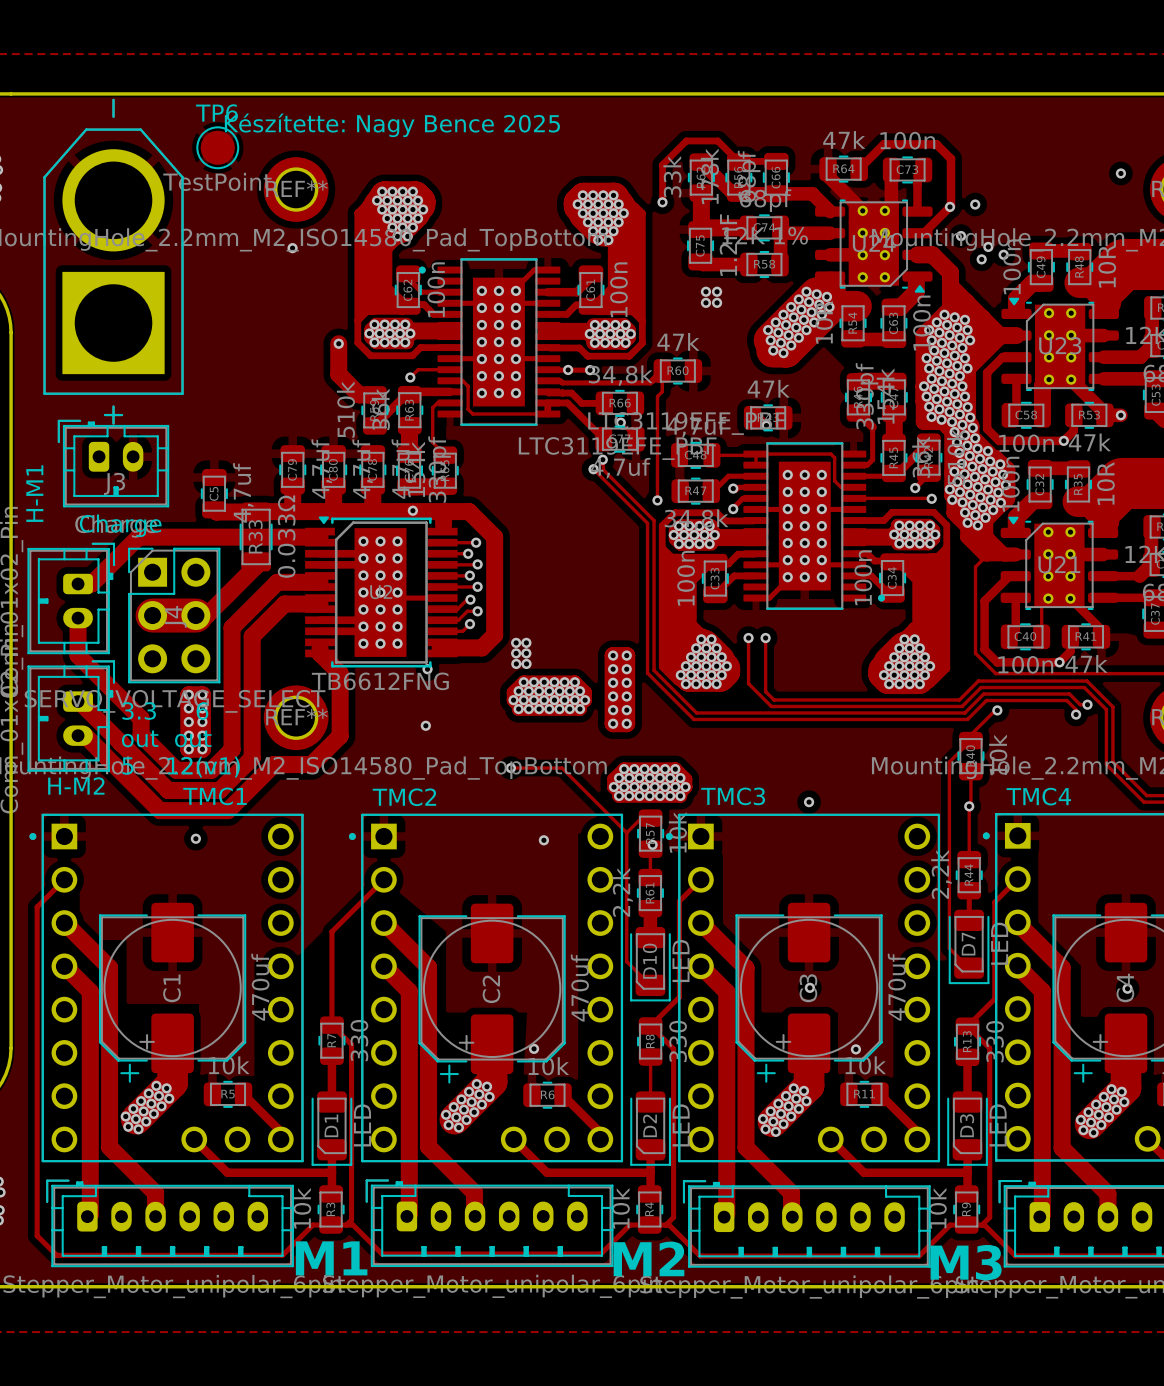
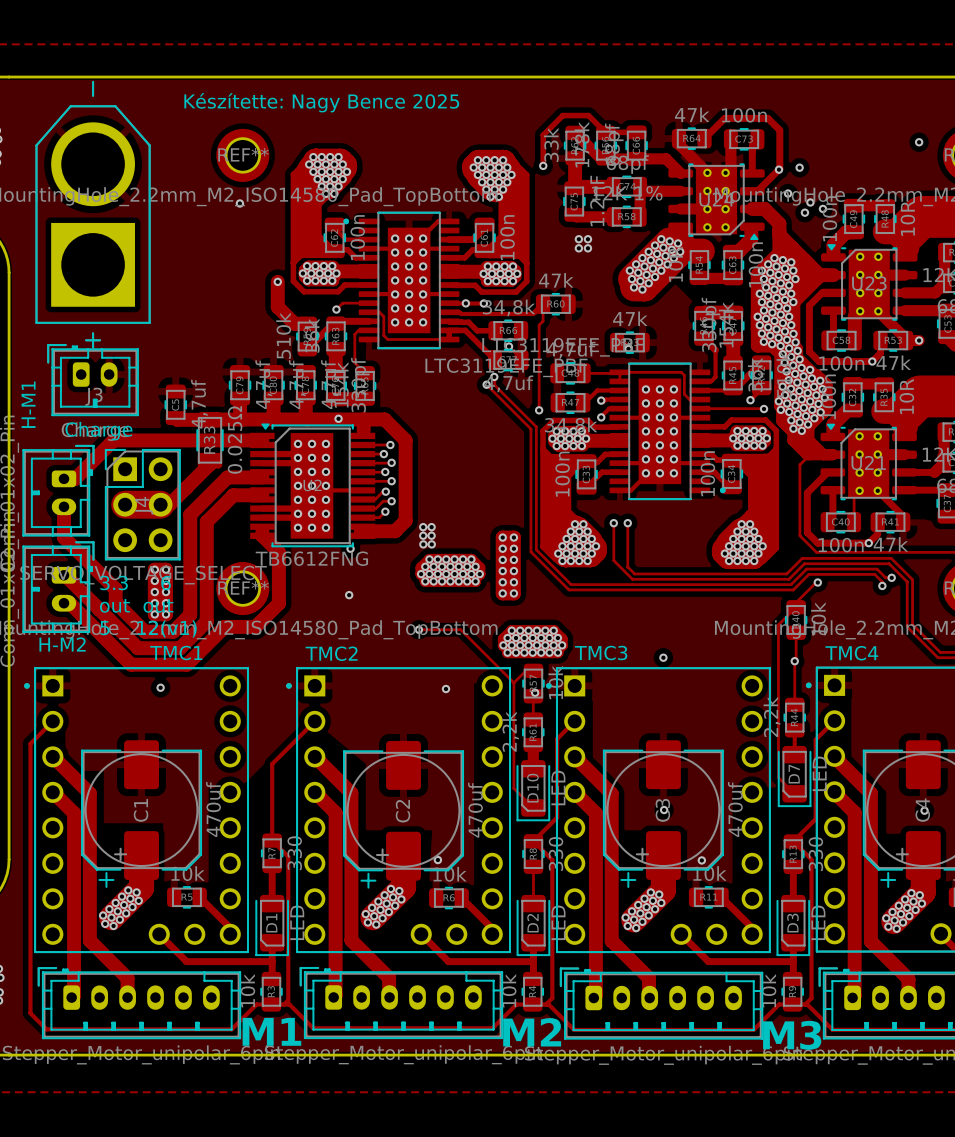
TP6: TestPoint (217, 147) -> none
R33 value: 0.033Ω (286, 536) -> 0.025Ω (235, 440)

